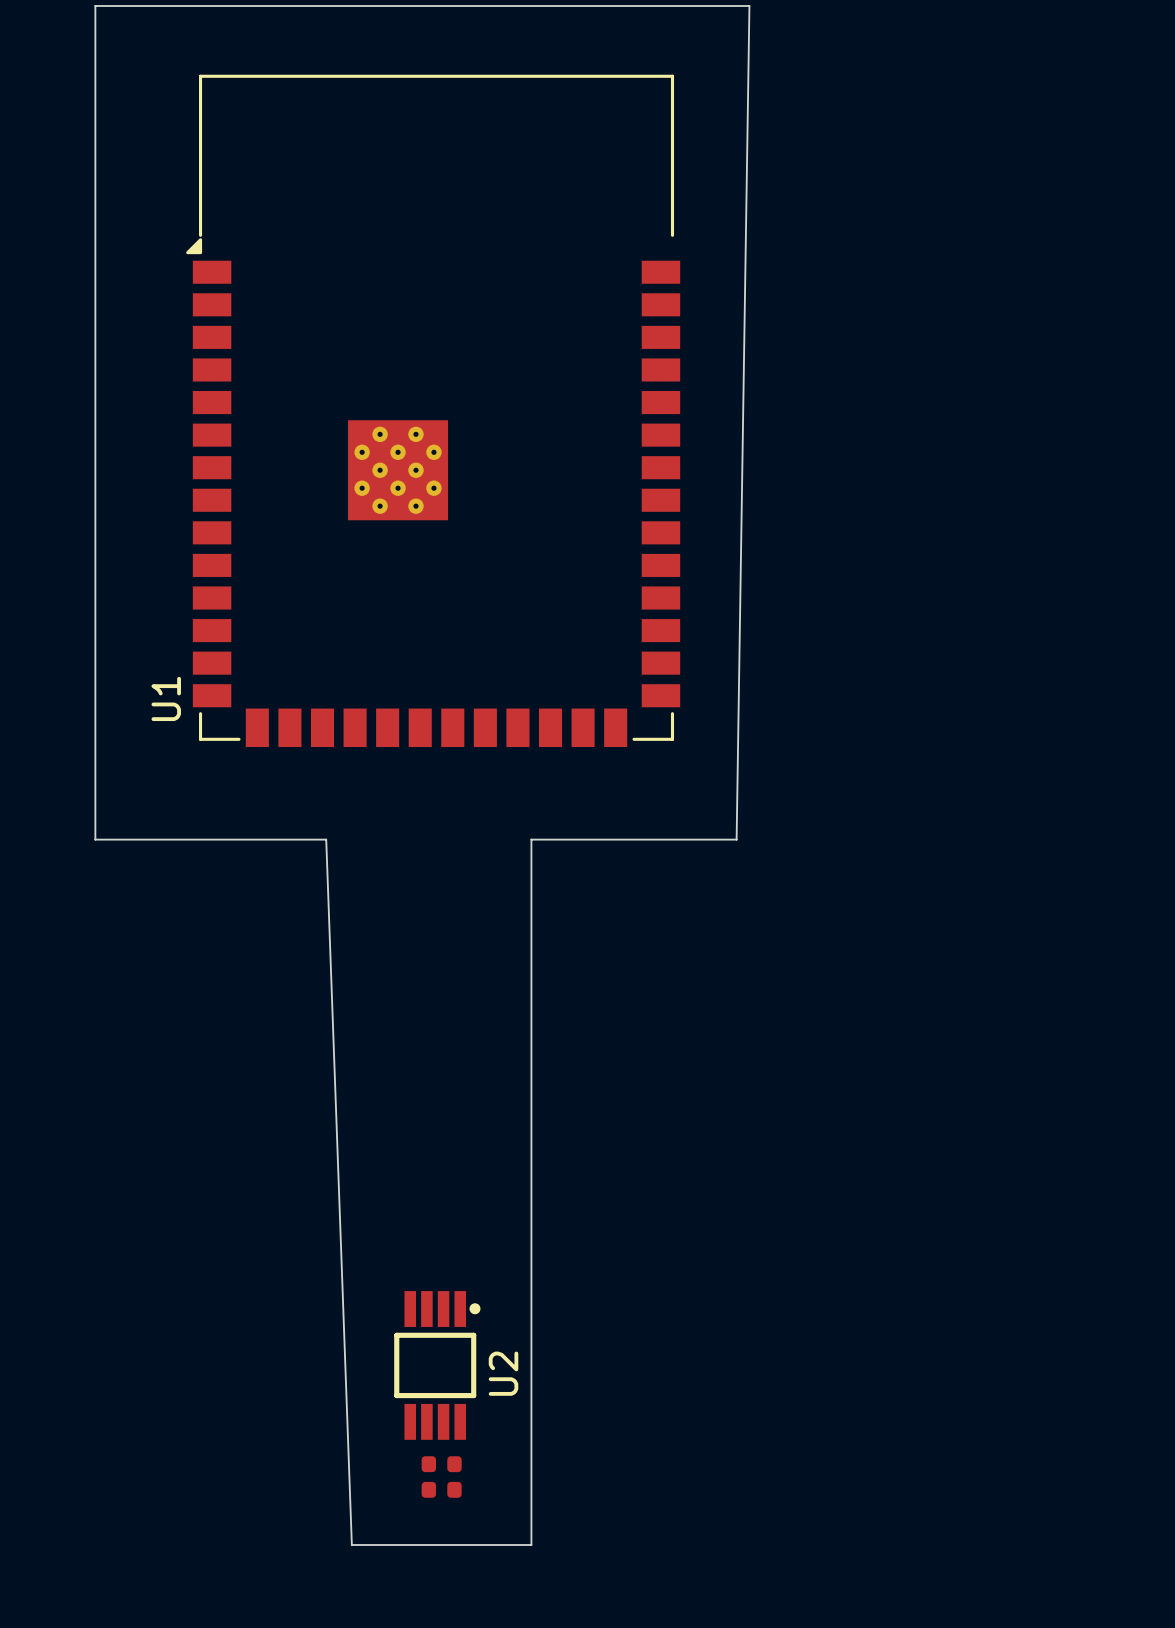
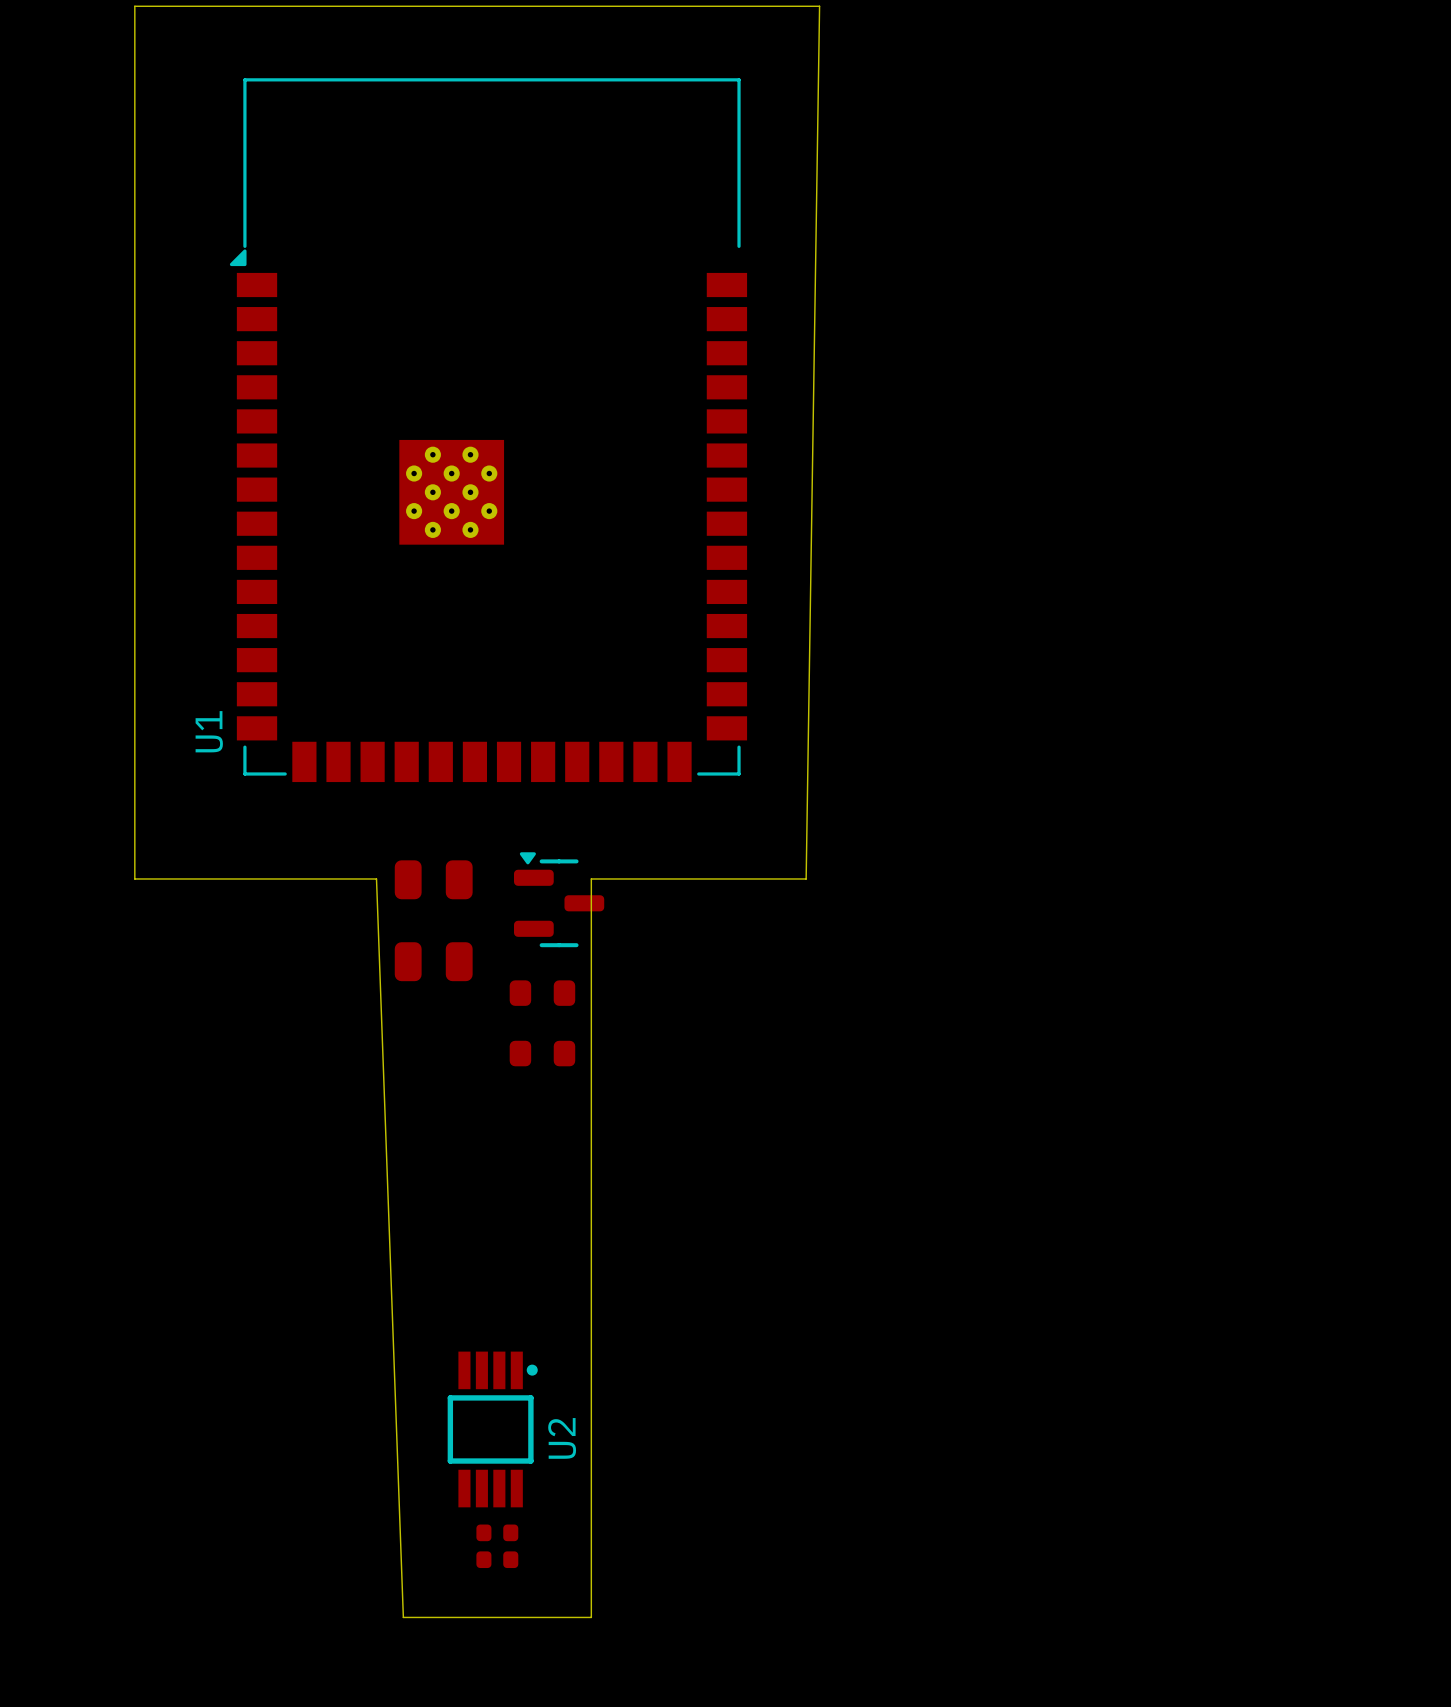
part: none -> (433, 879)
part: none -> (559, 899)
part: none -> (433, 961)
part: none -> (542, 993)
part: none -> (542, 1053)

